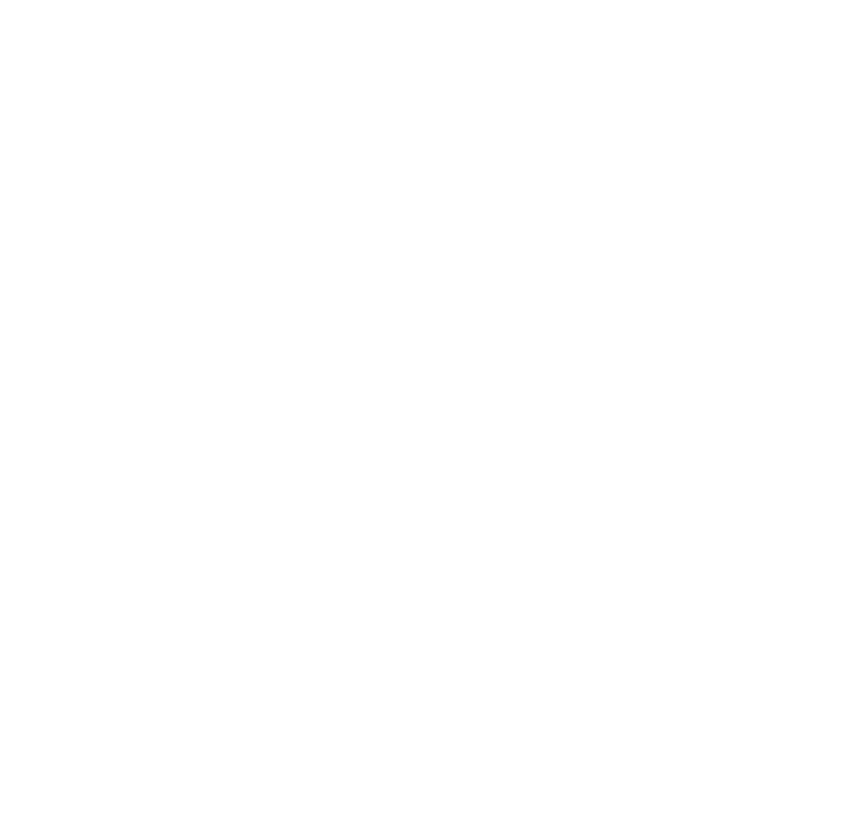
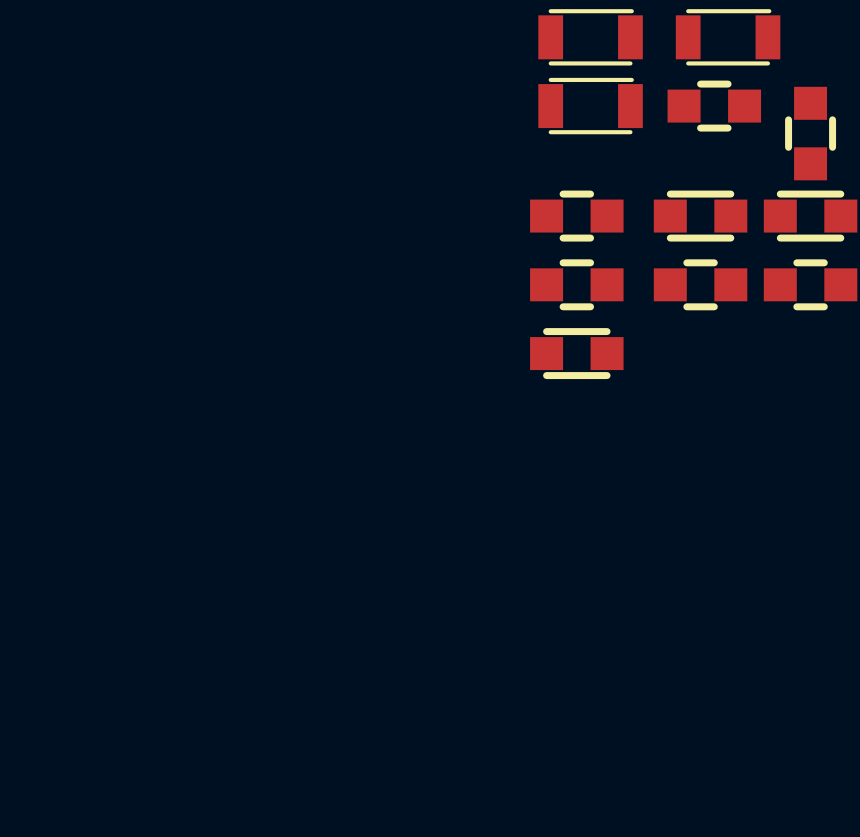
part: none -> (590, 37)
part: none -> (728, 37)
part: none -> (590, 106)
part: none -> (714, 106)
part: none -> (810, 133)
part: none -> (576, 216)
part: none -> (700, 216)
part: none -> (810, 216)
part: none -> (576, 284)
part: none -> (700, 284)
part: none -> (810, 284)
part: none -> (576, 353)

